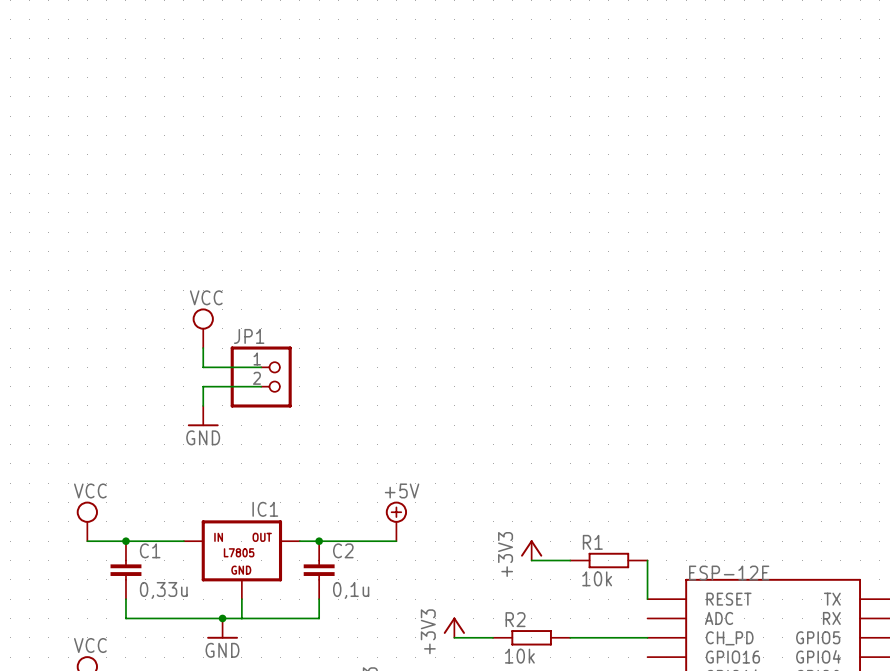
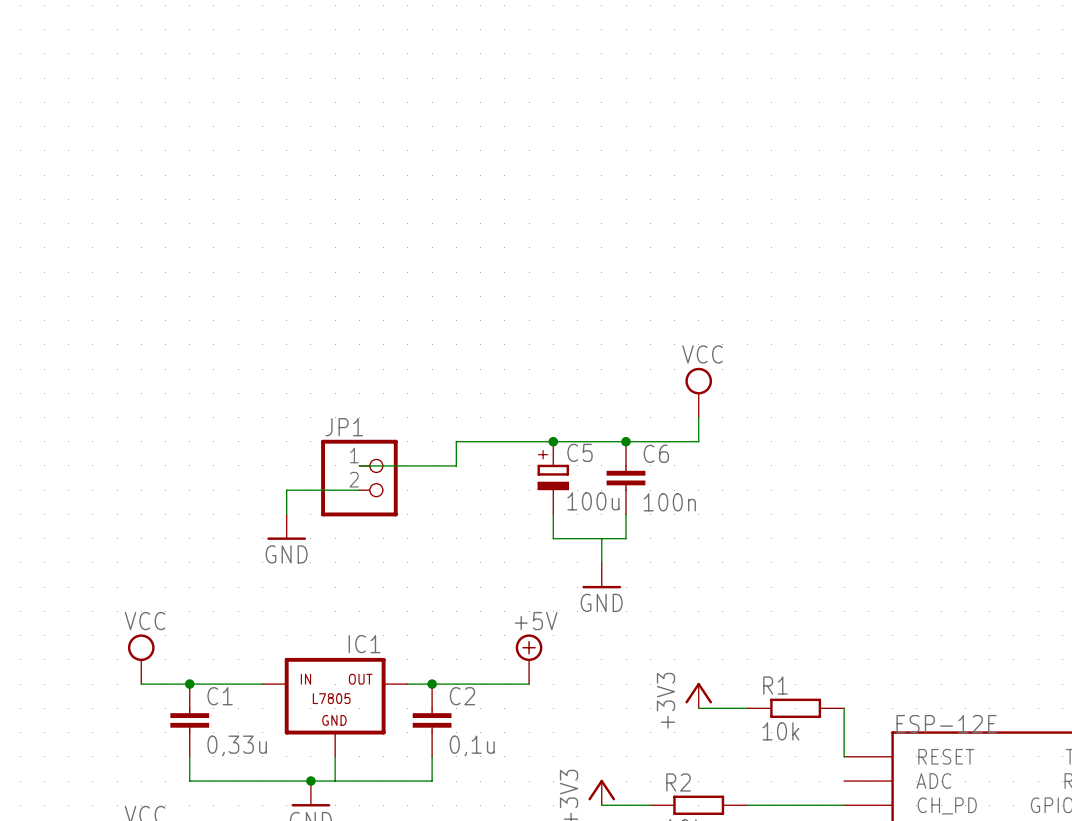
power symbol: none -> VCC (698, 392)
power symbol: VCC (203, 328) -> none
wire: (203, 348) (203, 367) (261, 367) -> (698, 417) (698, 441) (456, 441) (456, 465) (359, 465)
junction: none -> (553, 441)
junction: none -> (626, 441)
C5: none -> 100u (553, 478)
C6: none -> 100n (626, 478)
wire: none -> (553, 514) (553, 538) (626, 538) (626, 514)
wire: none -> (601, 538) (601, 562)
power symbol: none -> GND (601, 575)

